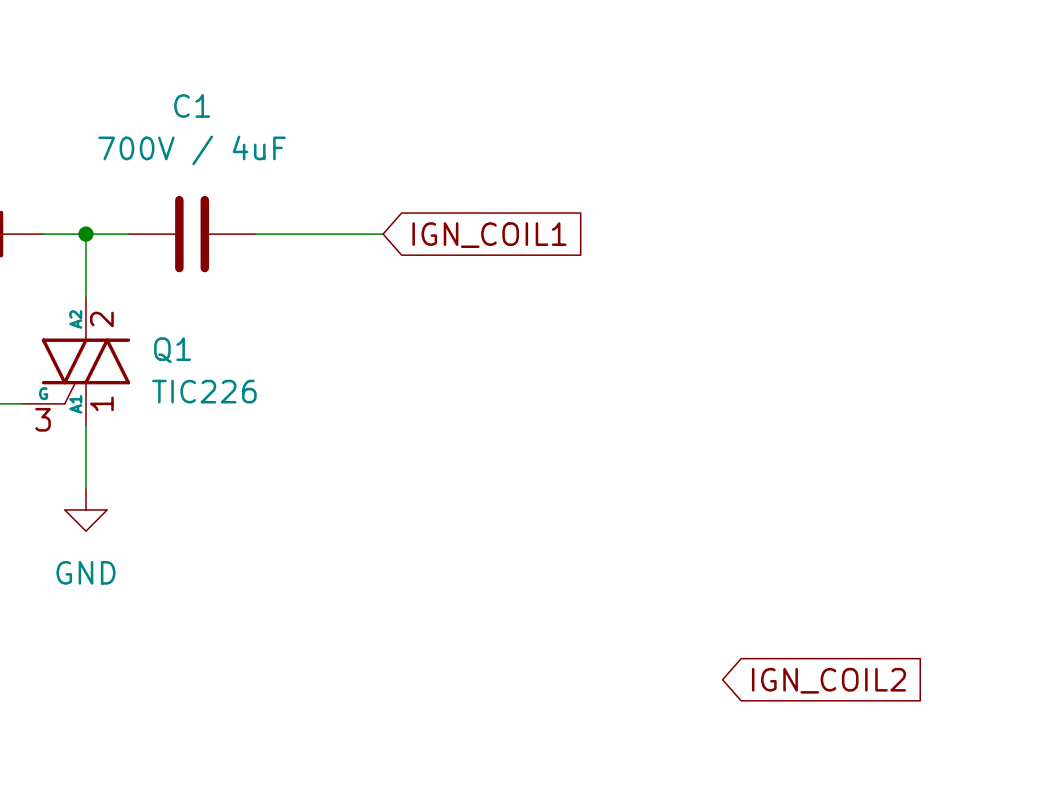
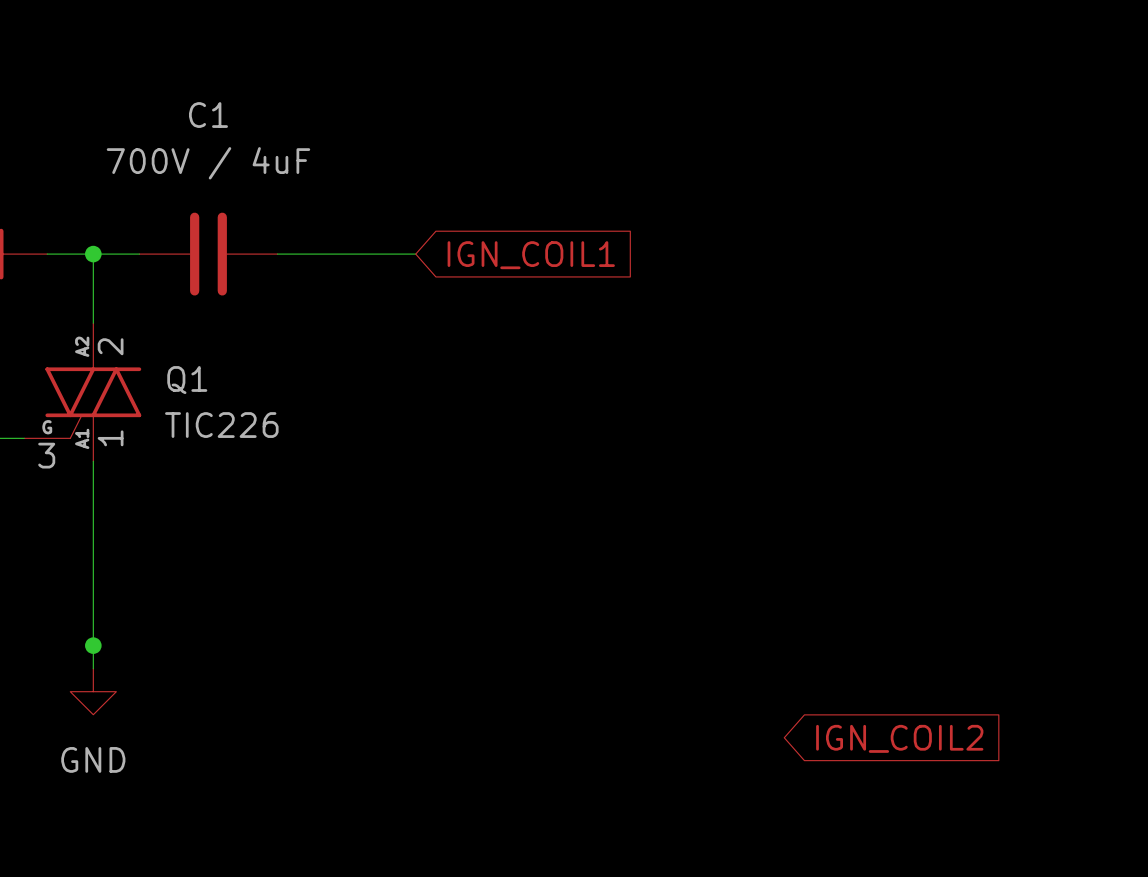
wire: none -> (93, 530) (93, 668)
power symbol position: GND (85, 509) -> GND (93, 691)
junction: none -> (93, 645)

